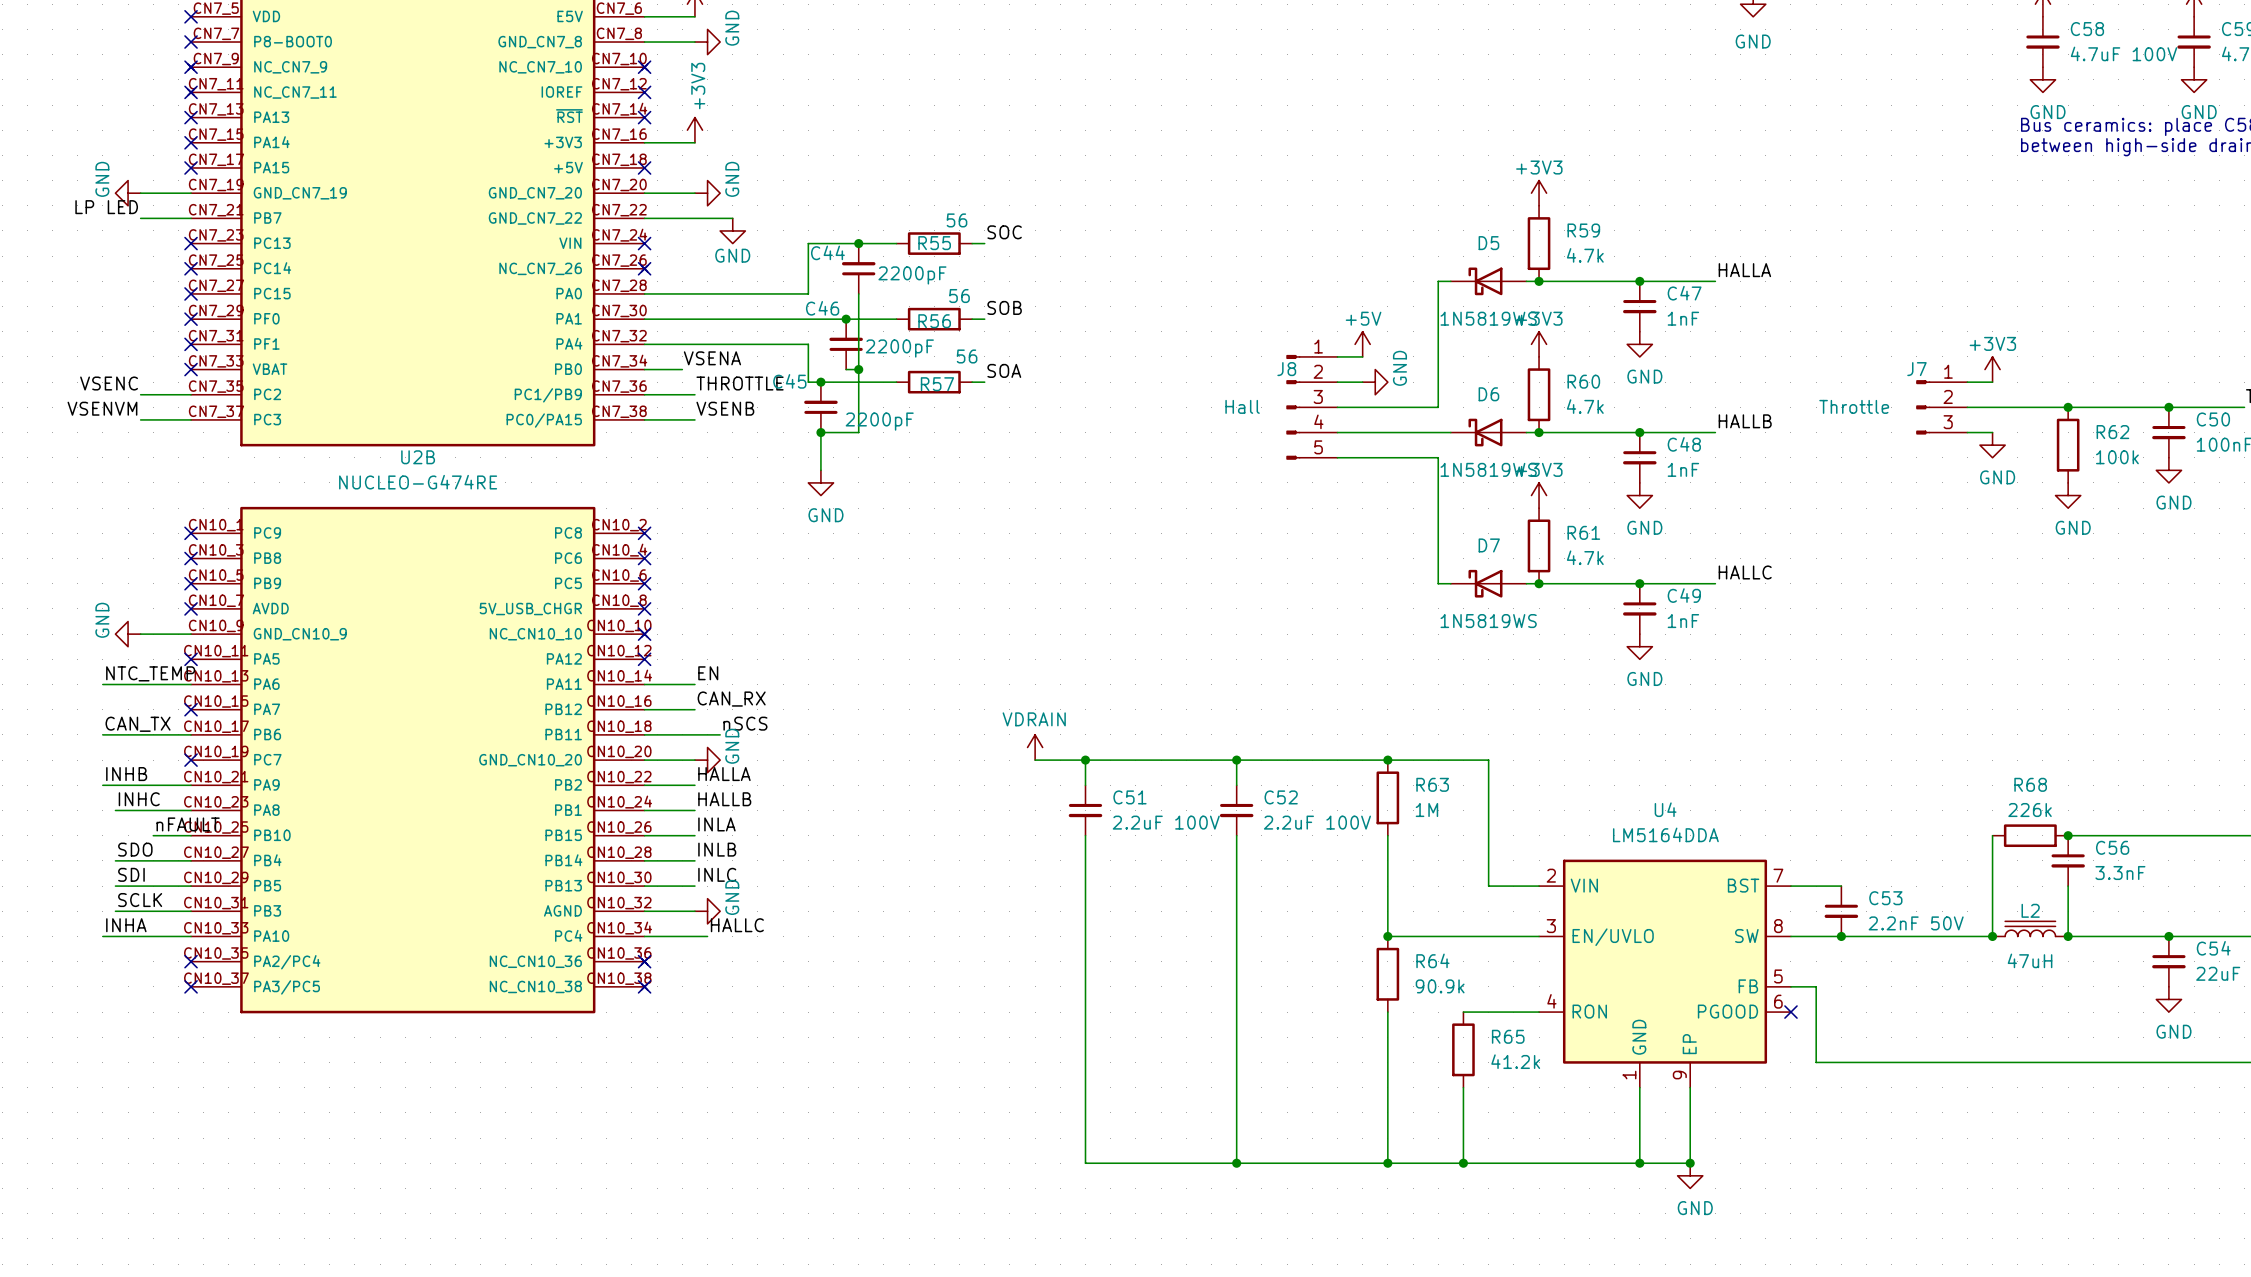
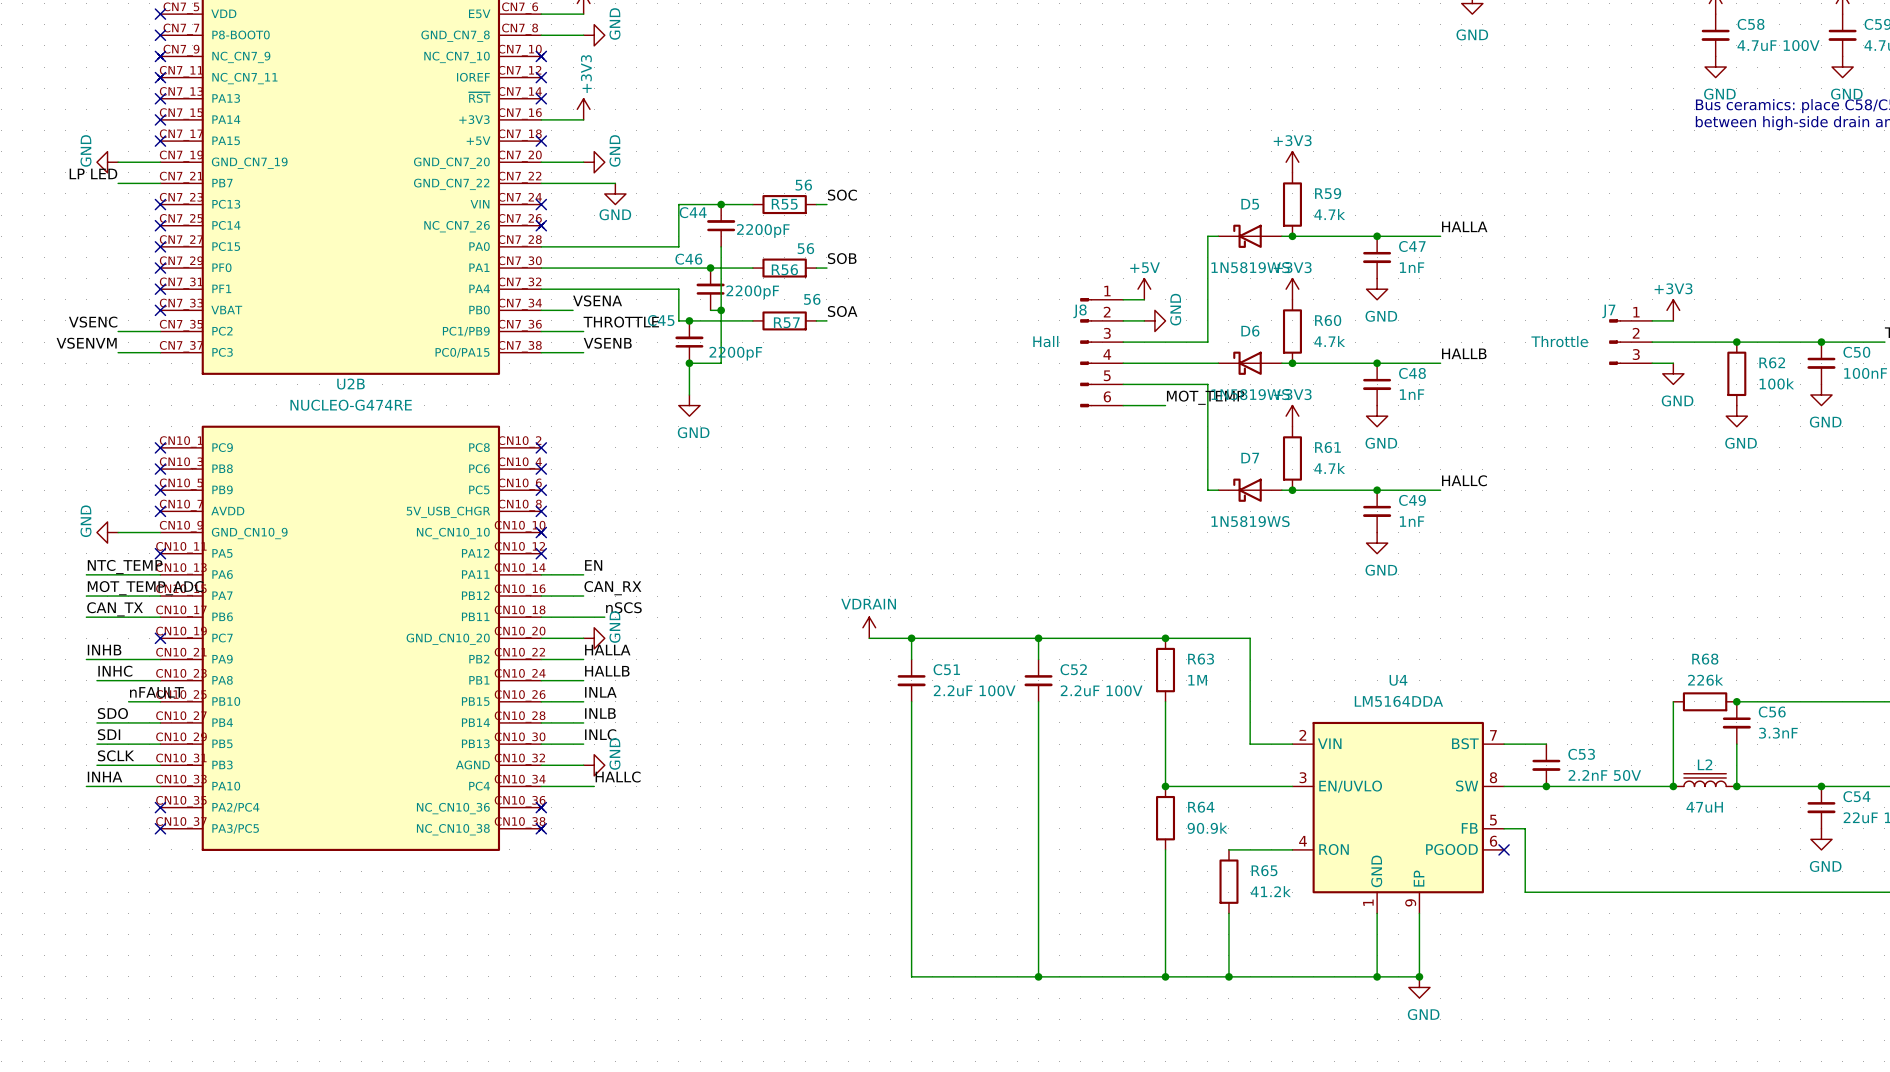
J8 symbol: [1286, 354, 1338, 460] -> [1080, 298, 1124, 408]
label: none -> MOT_TEMP (1205, 397)
wire: none -> (1123, 405) (1165, 405)
label: none -> MOT_TEMP_ADC (145, 588)
wire: none -> (86, 596) (160, 596)
no-connect mark: (191, 709) -> none

